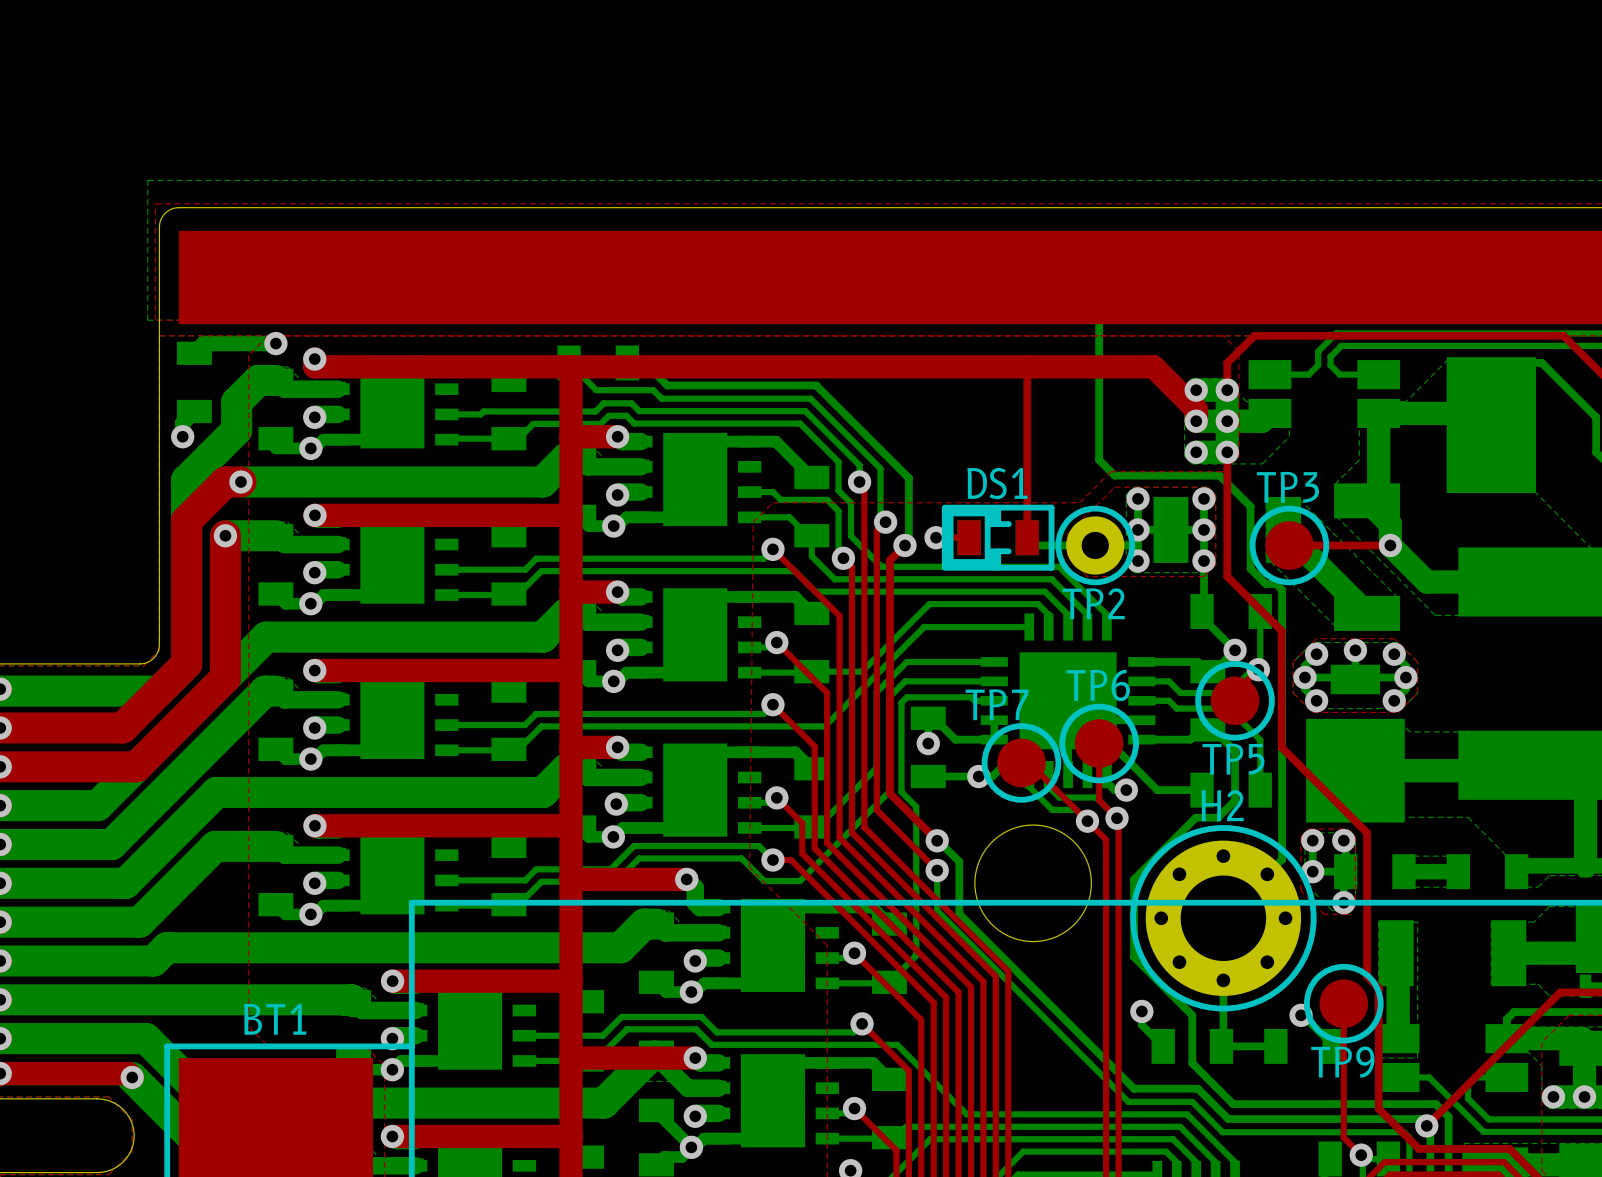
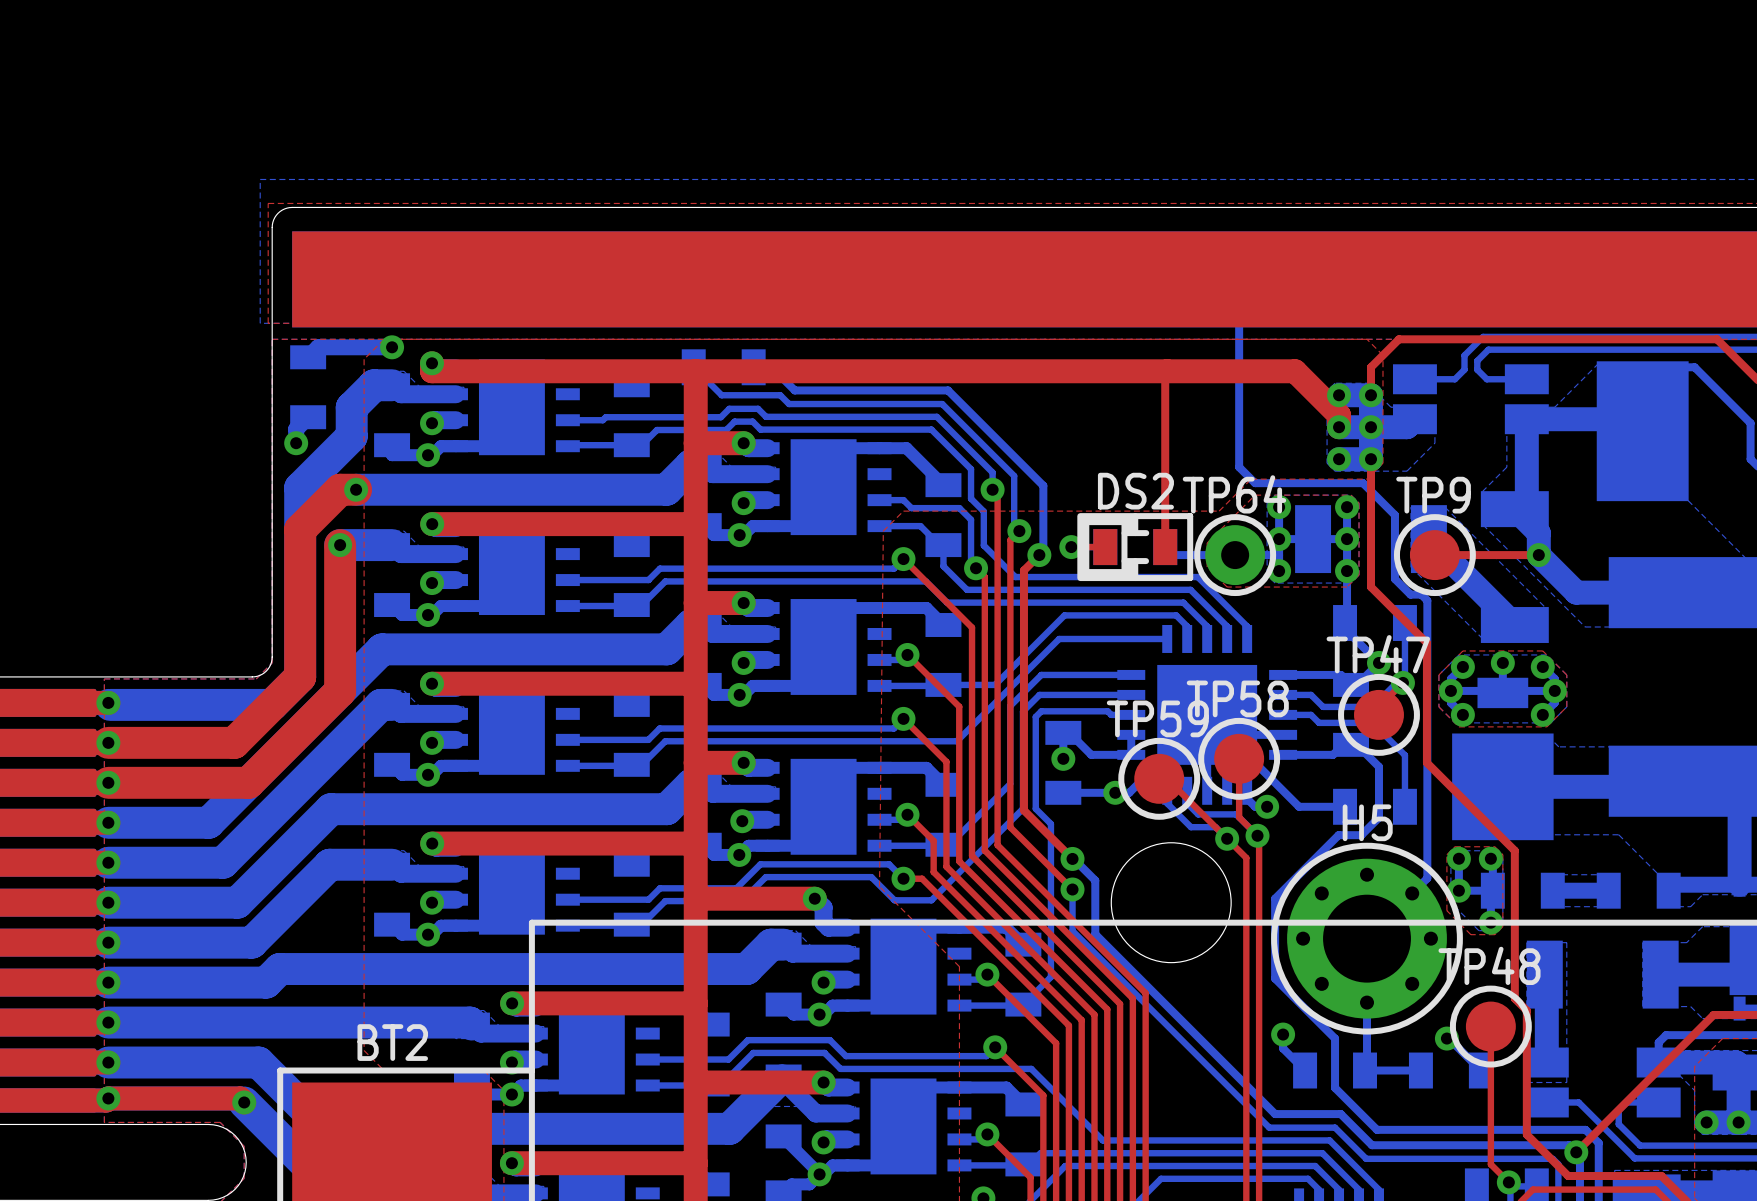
DS1 name: DS1 (997, 483) -> DS2 (1135, 491)
TP3 name: TP3 (1287, 487) -> TP9 (1433, 495)
TP2 name: TP2 (1093, 603) -> TP64 (1234, 494)
TP6 name: TP6 (1098, 685) -> TP58 (1237, 698)
TP7 name: TP7 (997, 704) -> TP59 (1157, 718)
TP5 name: TP5 (1233, 759) -> TP47 (1378, 654)
H2 name: H2 (1222, 805) -> H5 (1367, 822)
BT1 name: BT1 (275, 1019) -> BT2 (392, 1042)
TP9 name: TP9 (1342, 1062) -> TP48 (1489, 965)

